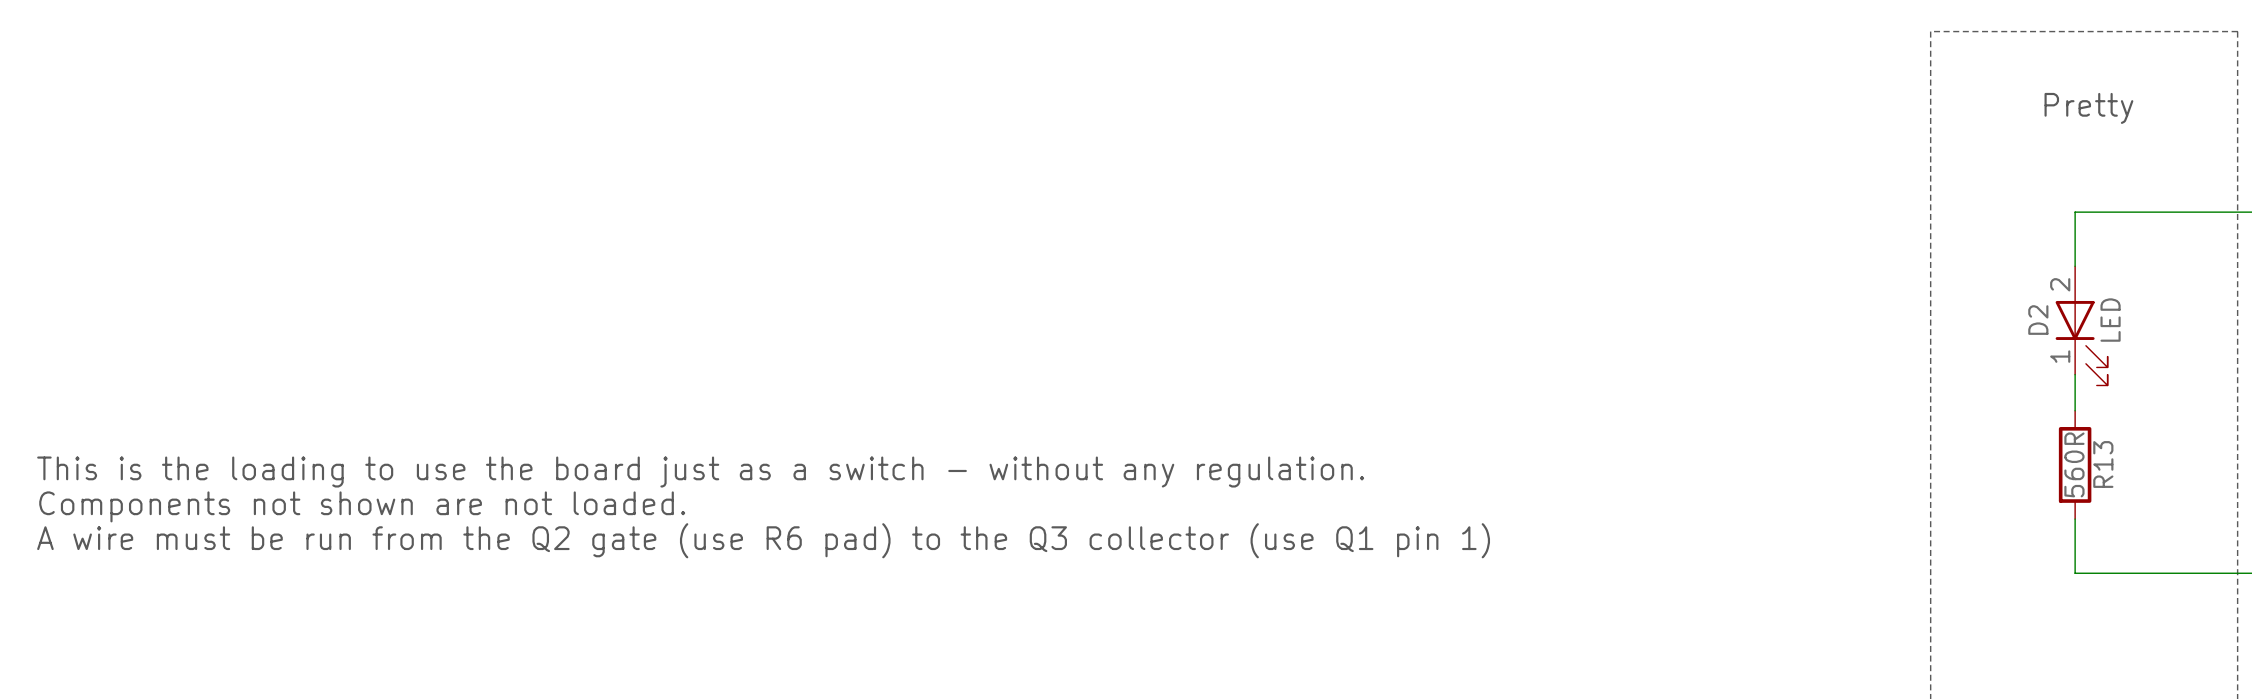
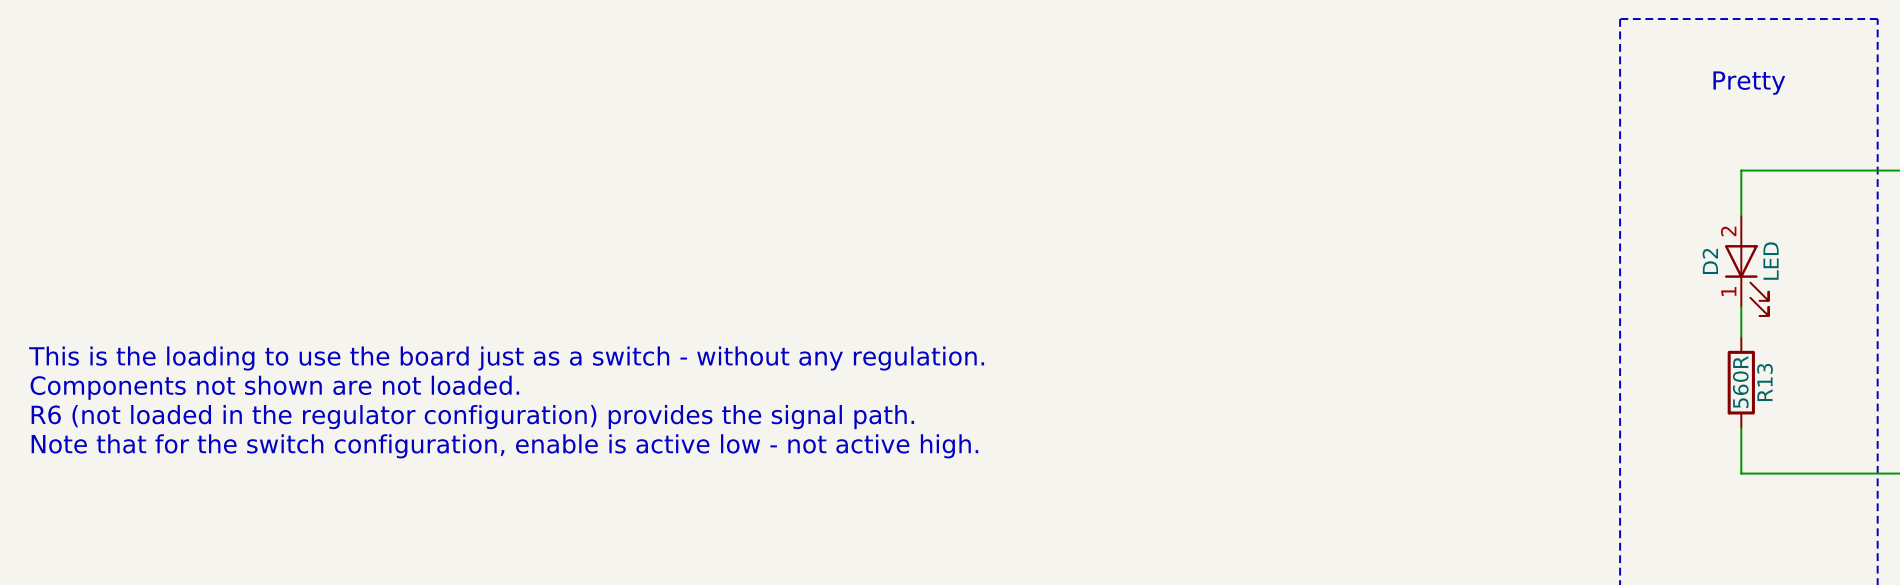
text: none -> This is the loading to use the board just as a switch - without any regulation. (506, 358)
text: This is the loading to use the board just as a switch - without any regulation. (700, 472) -> Components not shown are not loaded. (274, 387)
text: Components not shown are not loaded. (362, 506) -> R6 (not loaded in the regulator configuration) provides the signal path. (472, 417)
text: A wire must be run from the Q2 gate (use R6 pad) to the Q3 collector (use Q1 pin 1) (763, 540) -> Note that for the switch configuration, enable is active low - not active high. (504, 446)

